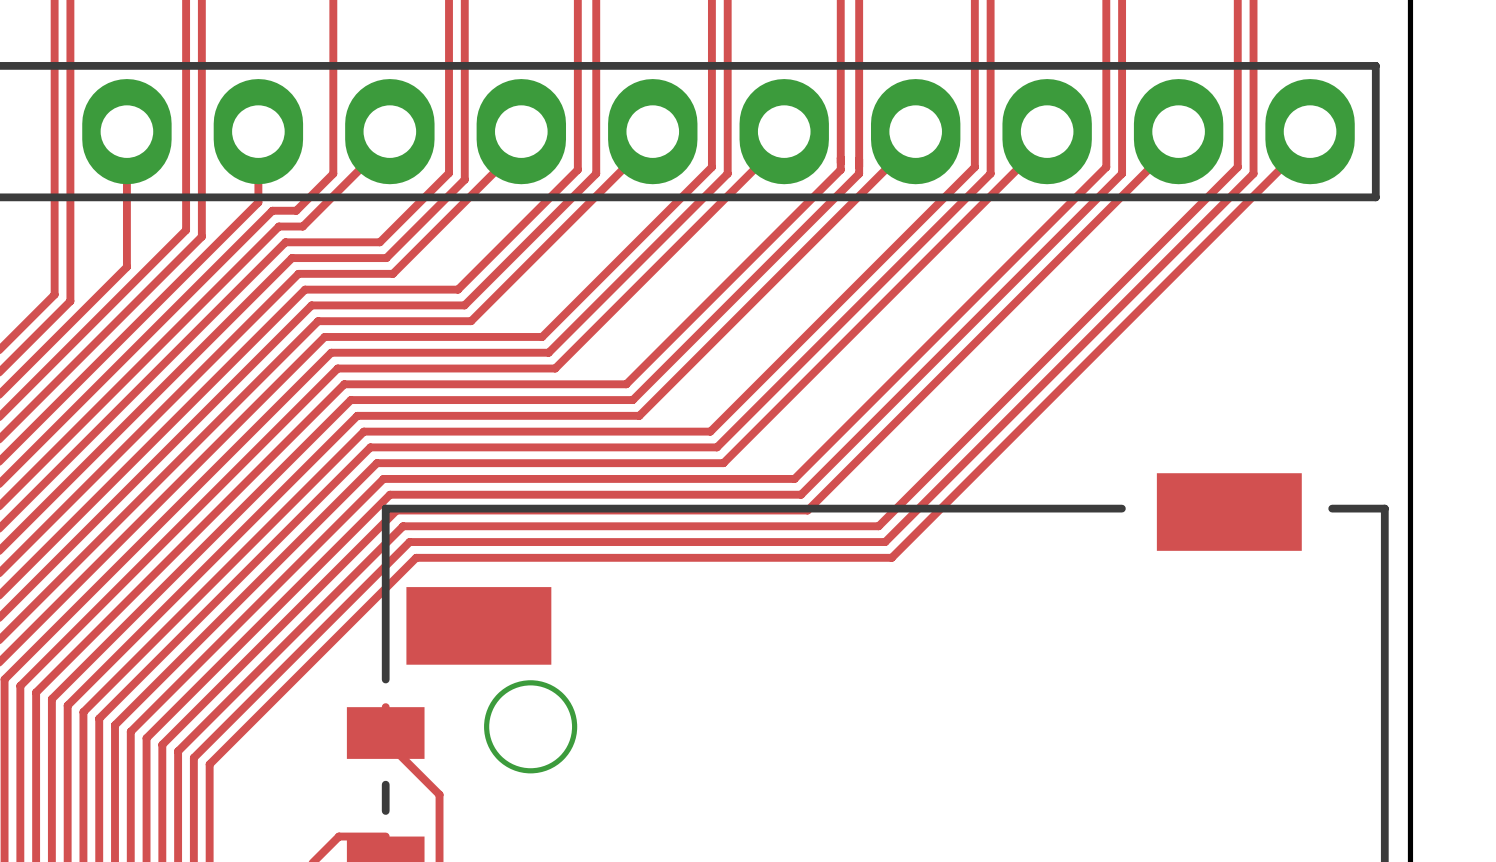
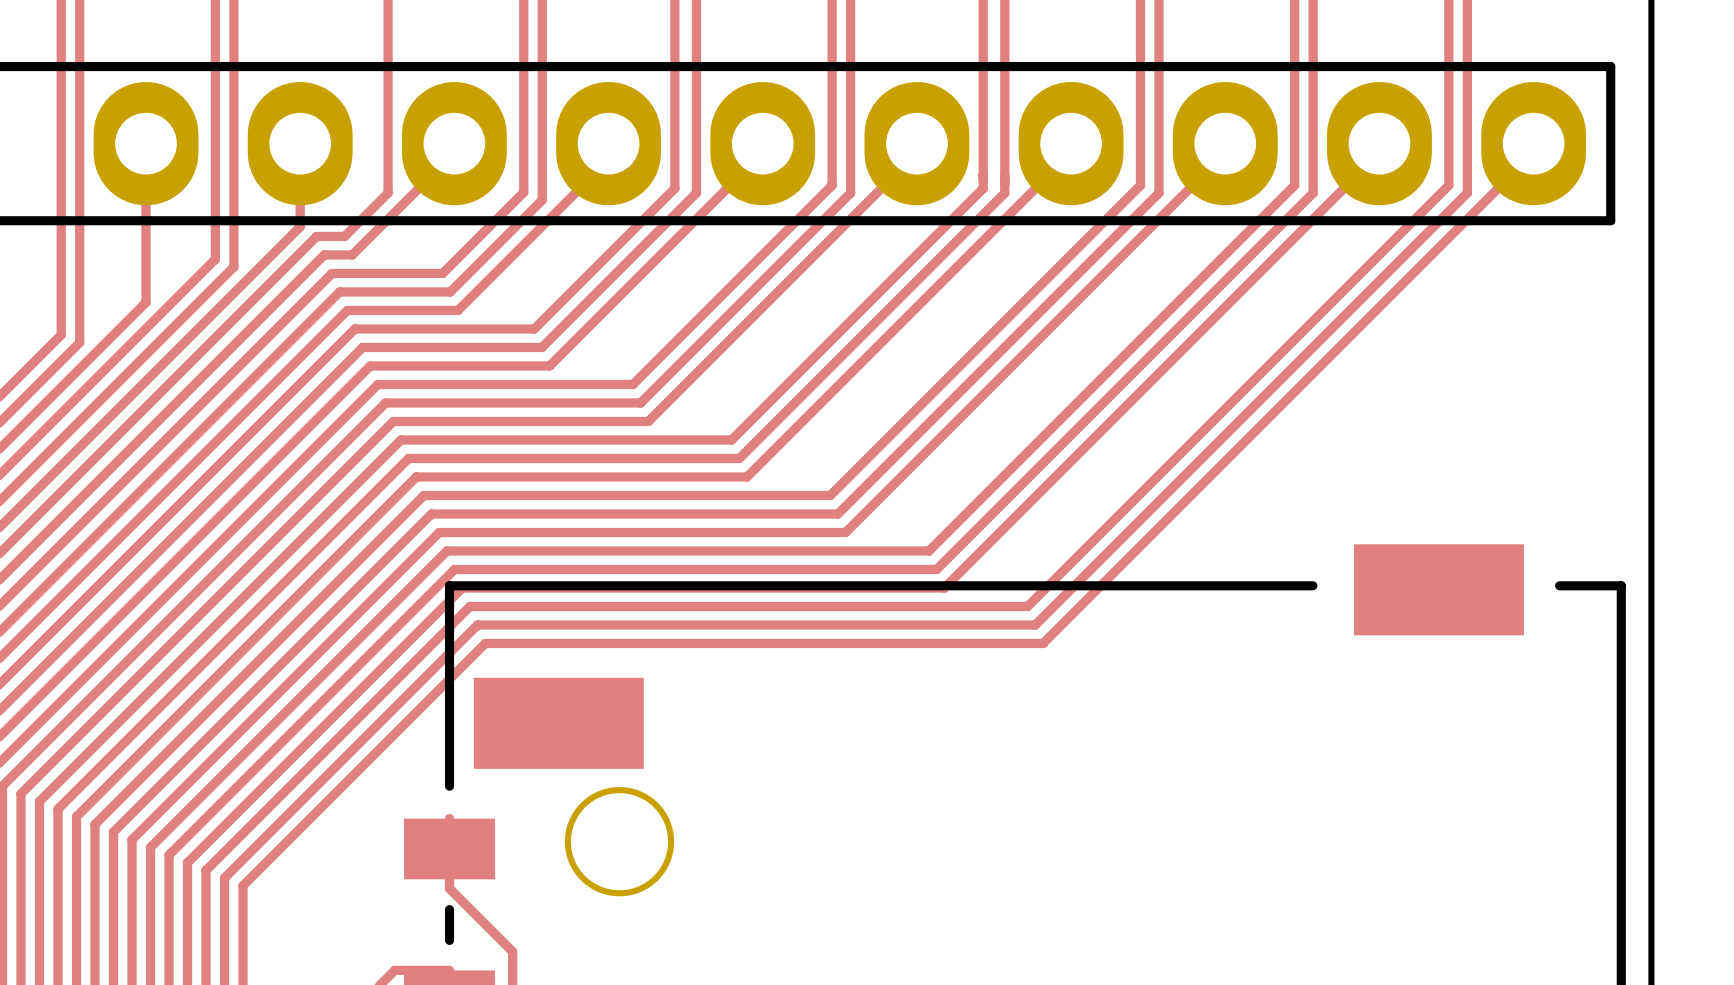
top track: (385, 740) (439, 794) (439, 820) -> (449, 858) (449, 888) (512, 951)

